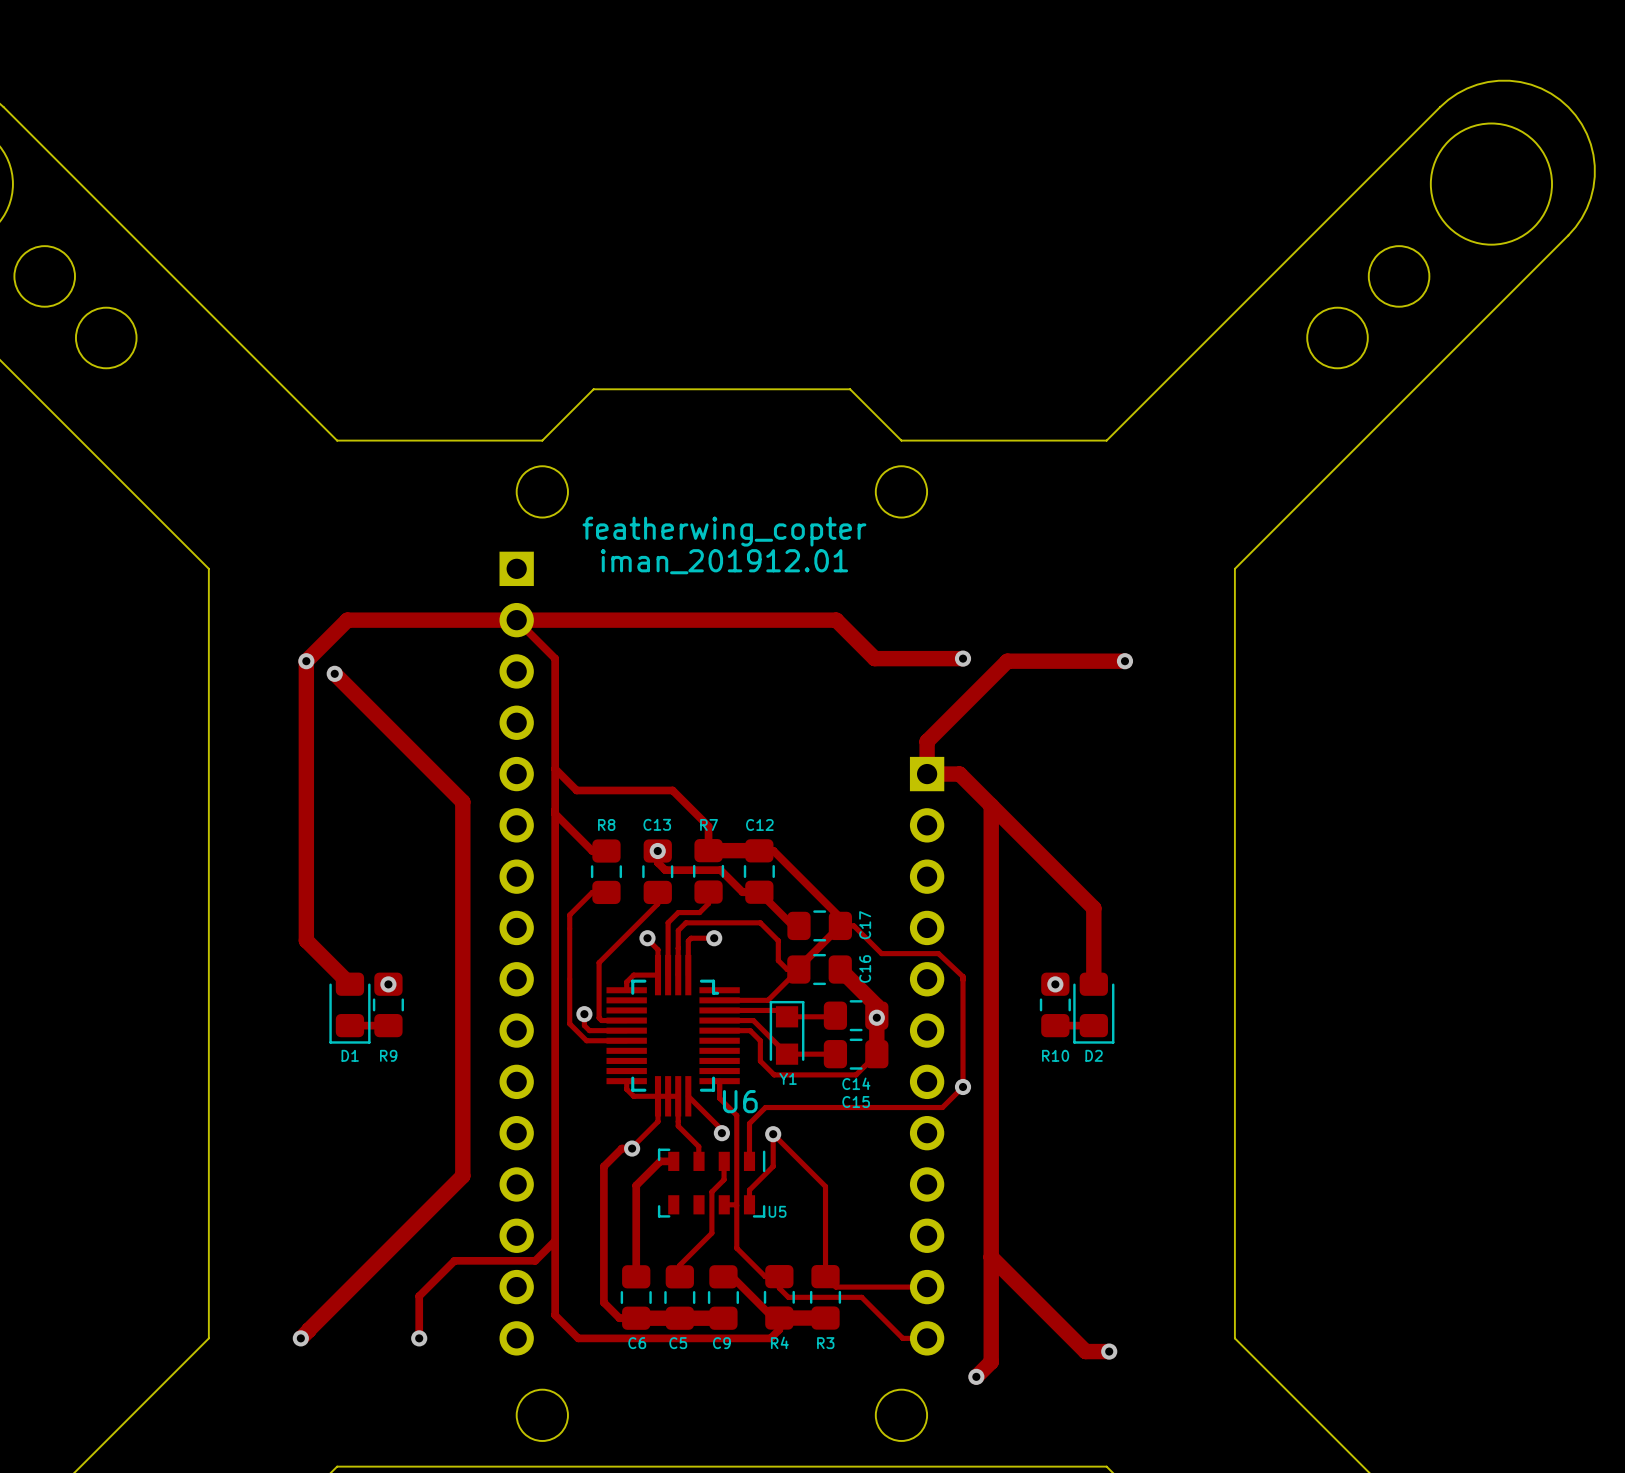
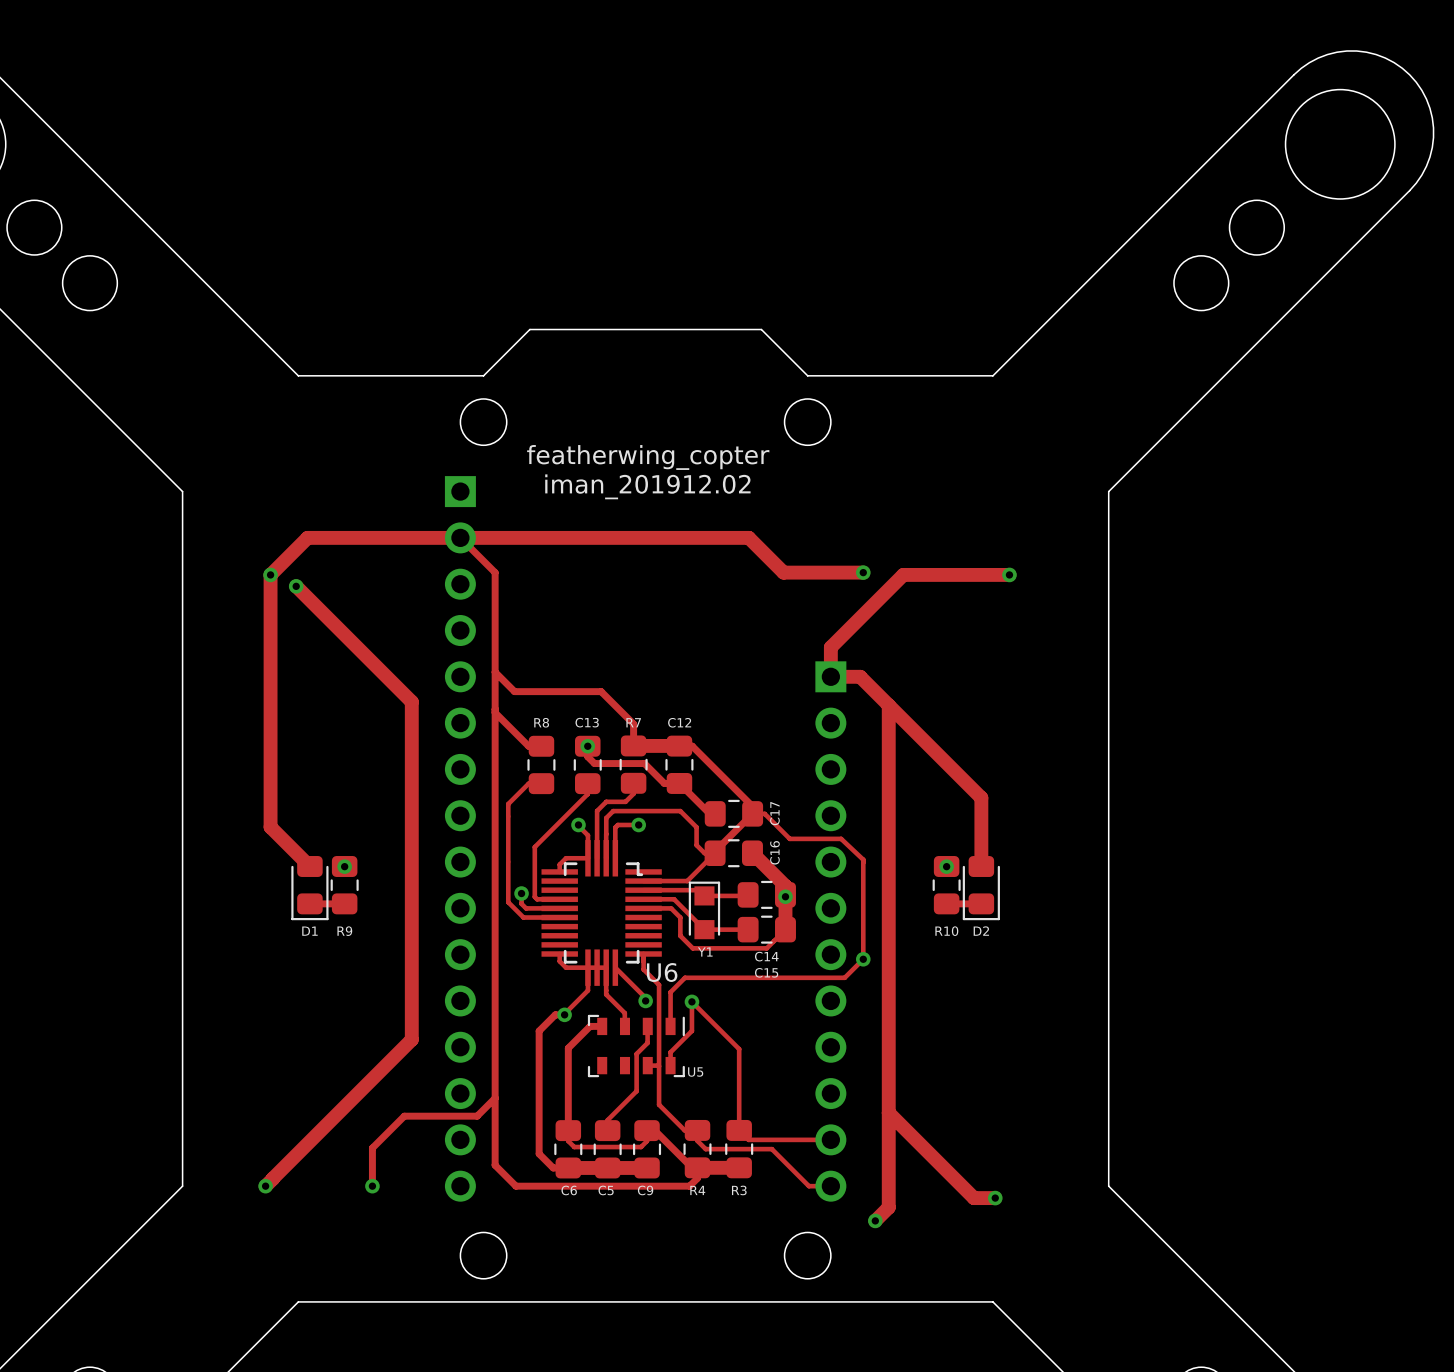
text: iman_201912.01 (724, 561) -> iman_201912.02 (647, 486)
track: none -> (568, 1130) (568, 1141) (574, 1147) (641, 1147) (647, 1141) (647, 1130)

